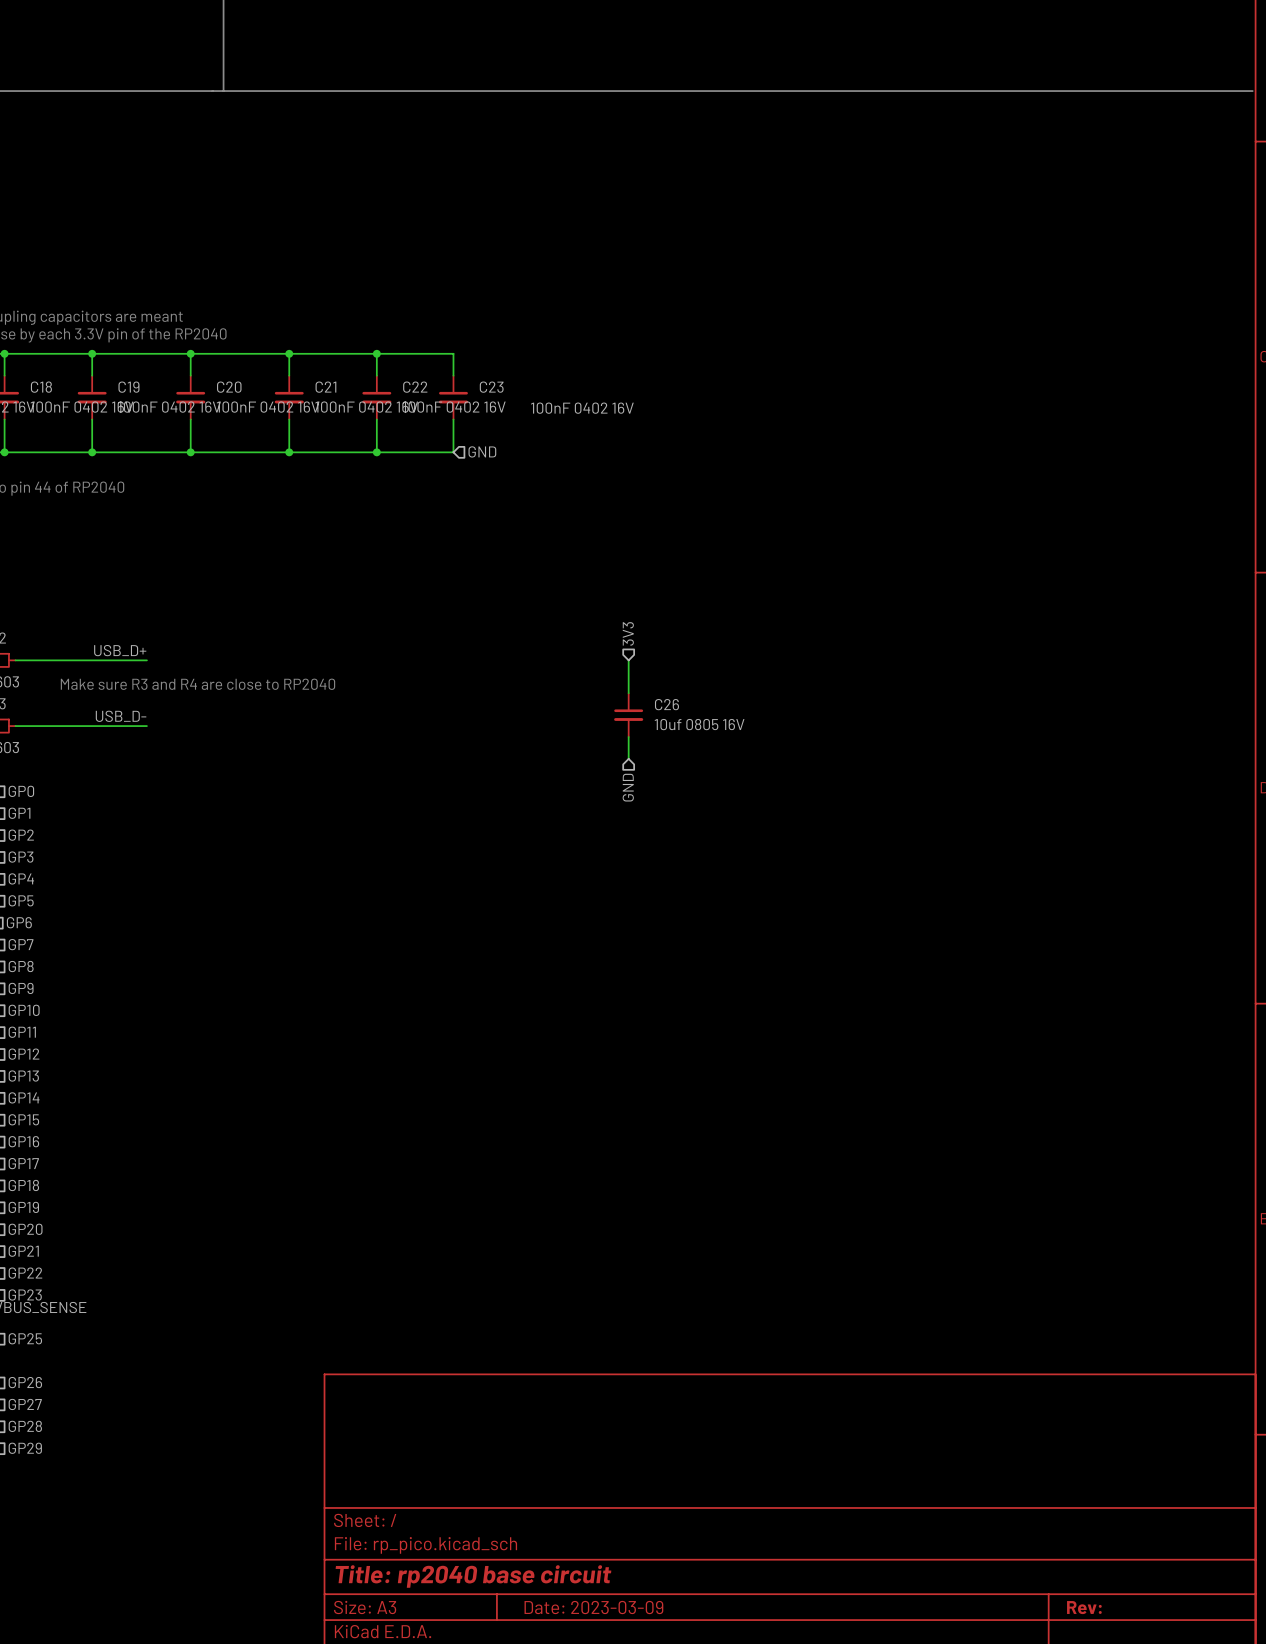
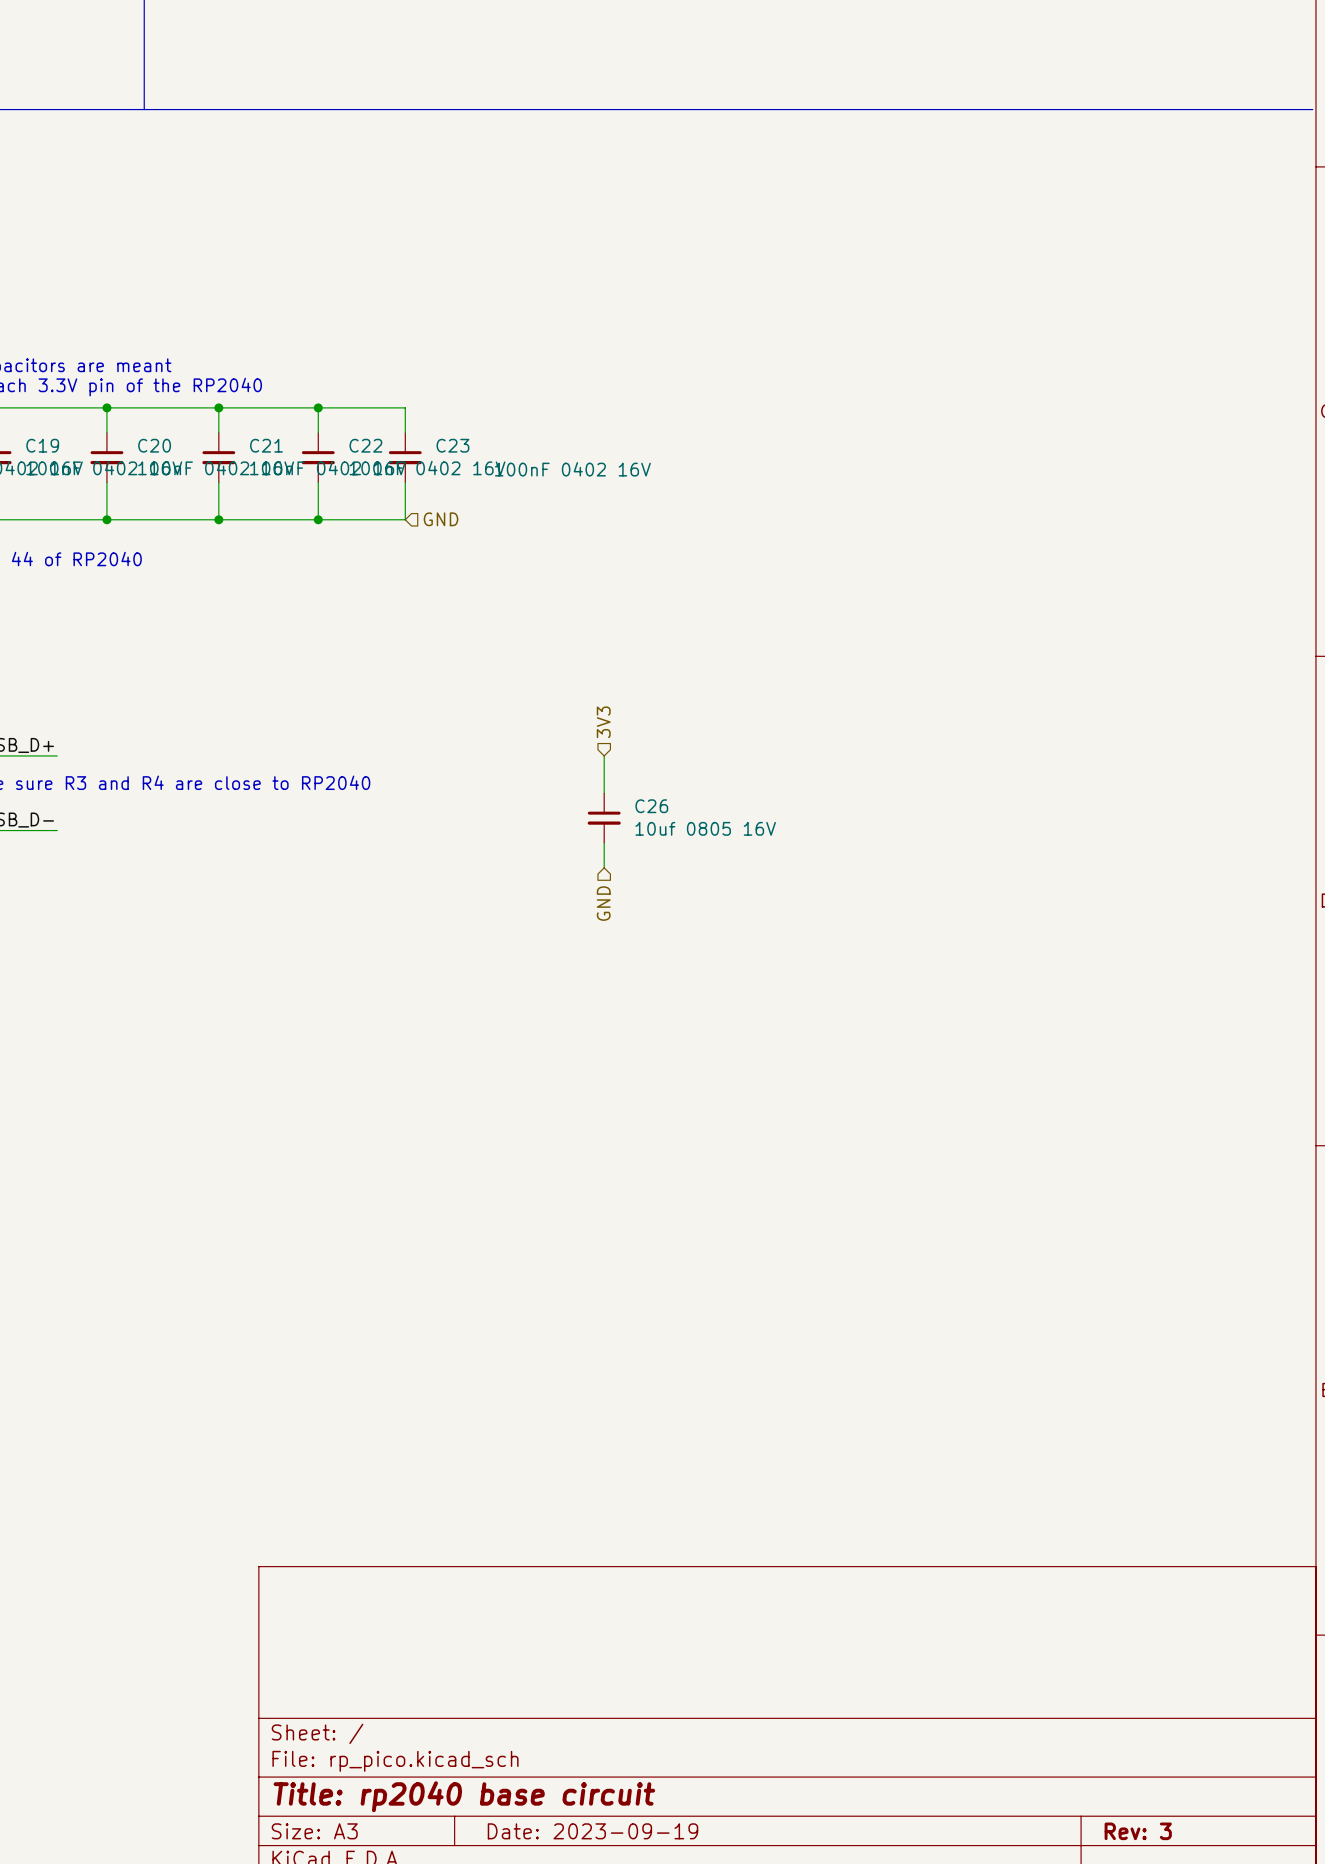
title block: Date: 2023-03-09 (593, 1607) -> Date: 2023-09-19 (592, 1831)
title block: Rev: (1084, 1607) -> Rev: 3 (1138, 1831)

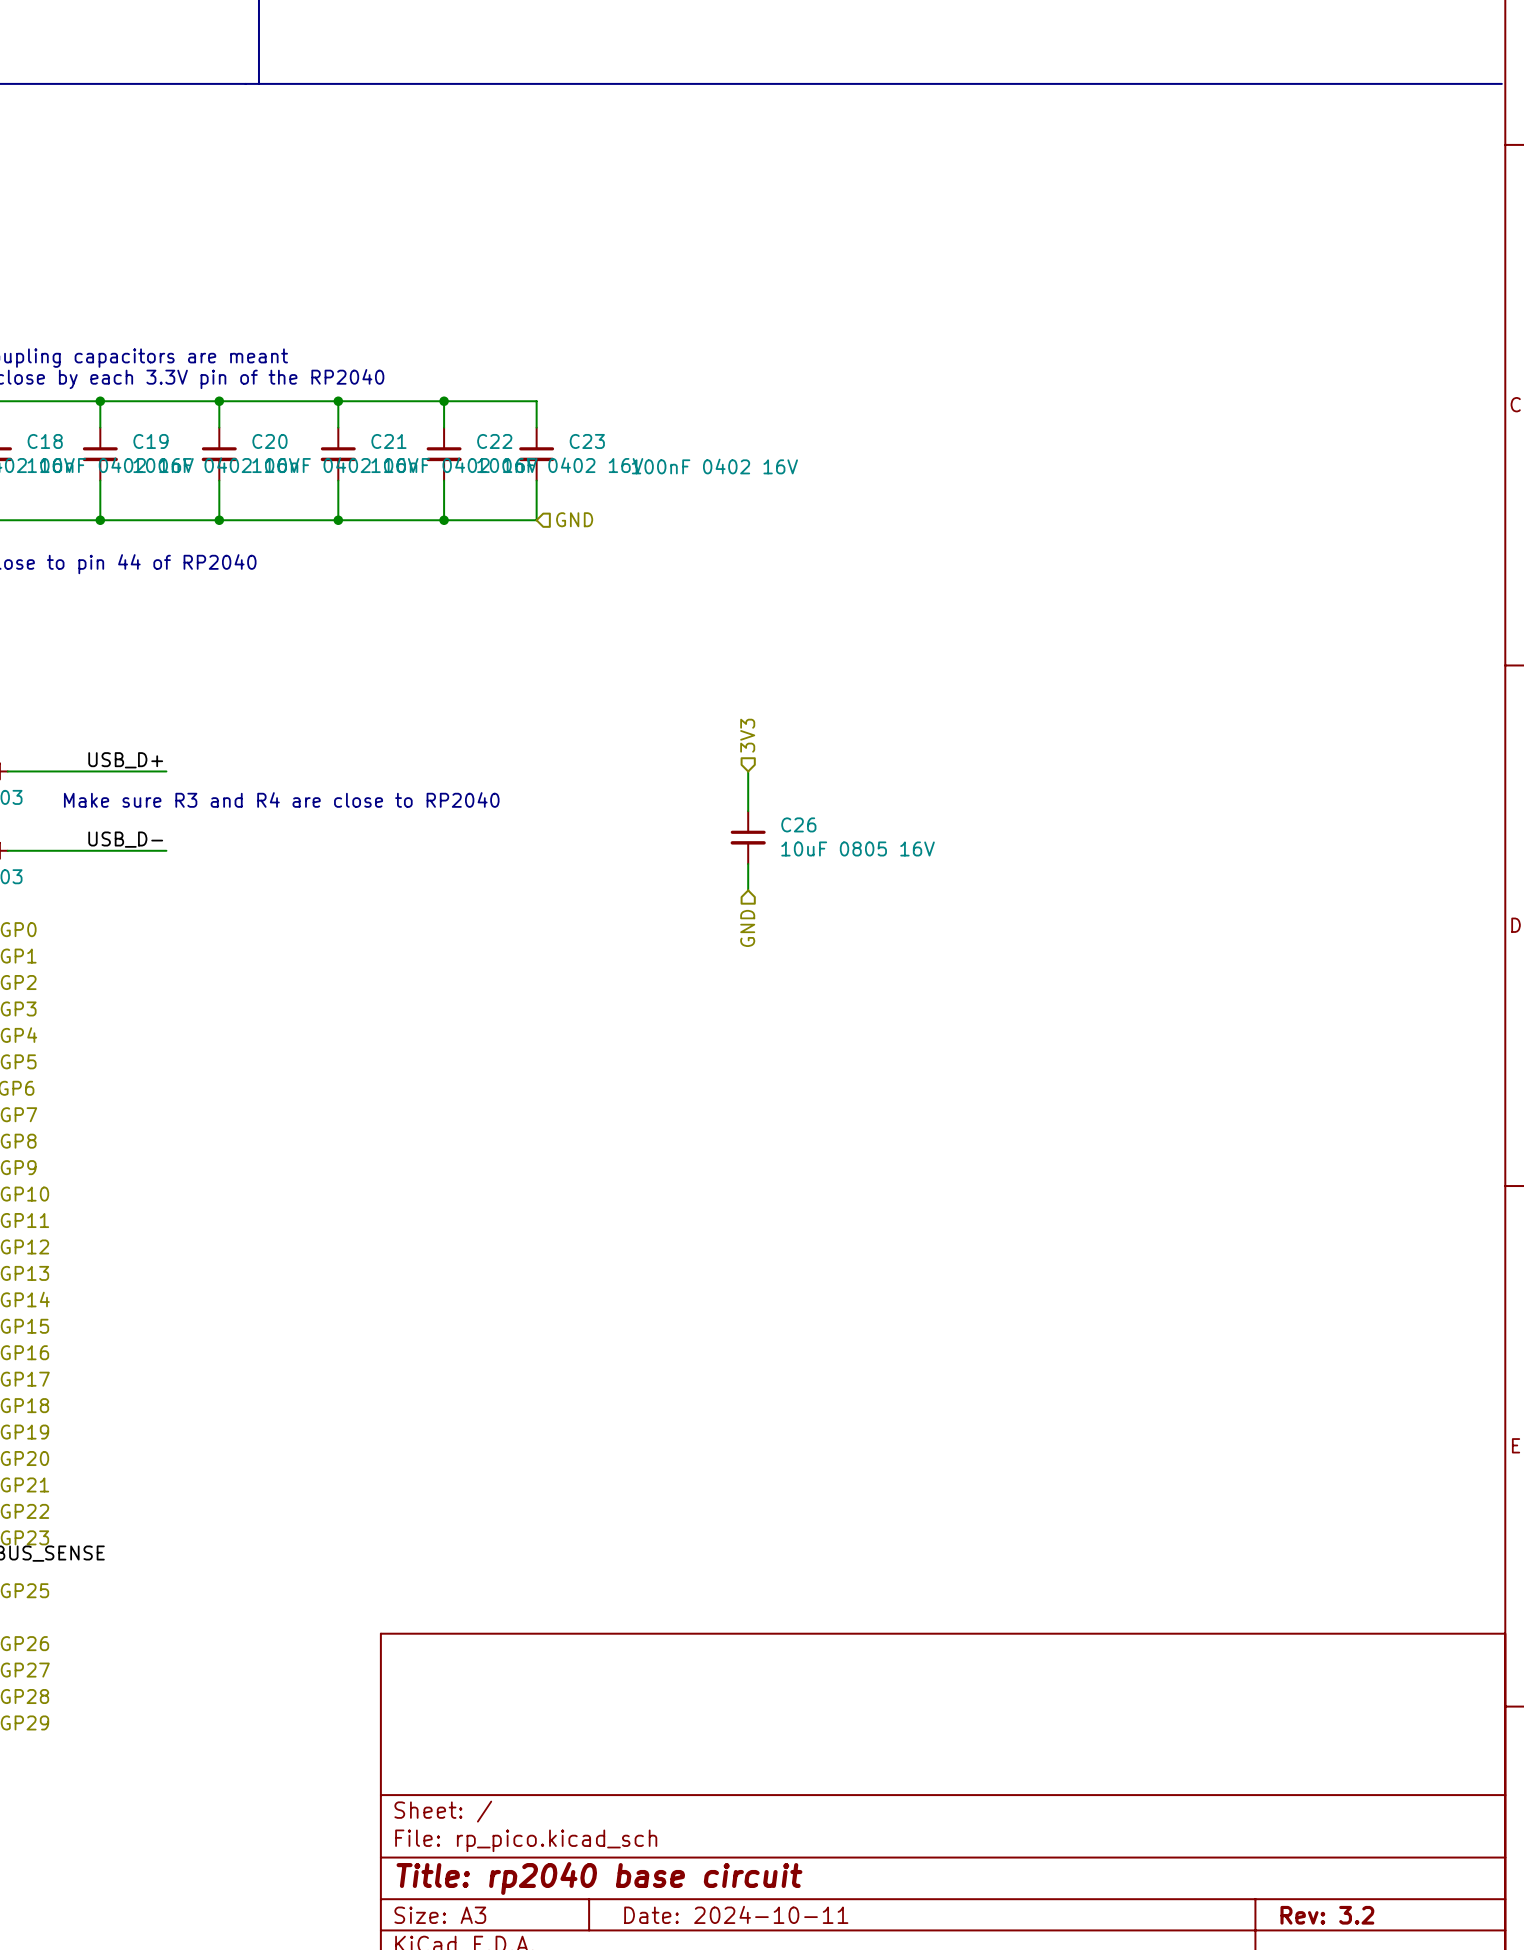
C26 value: 10uf 0805 16V (705, 828) -> 10uF 0805 16V (858, 848)
title block: Date: 2023-09-19 (592, 1831) -> Date: 2024-10-11 (736, 1914)
title block: Rev: 3 (1138, 1831) -> Rev: 3.2 (1327, 1915)

